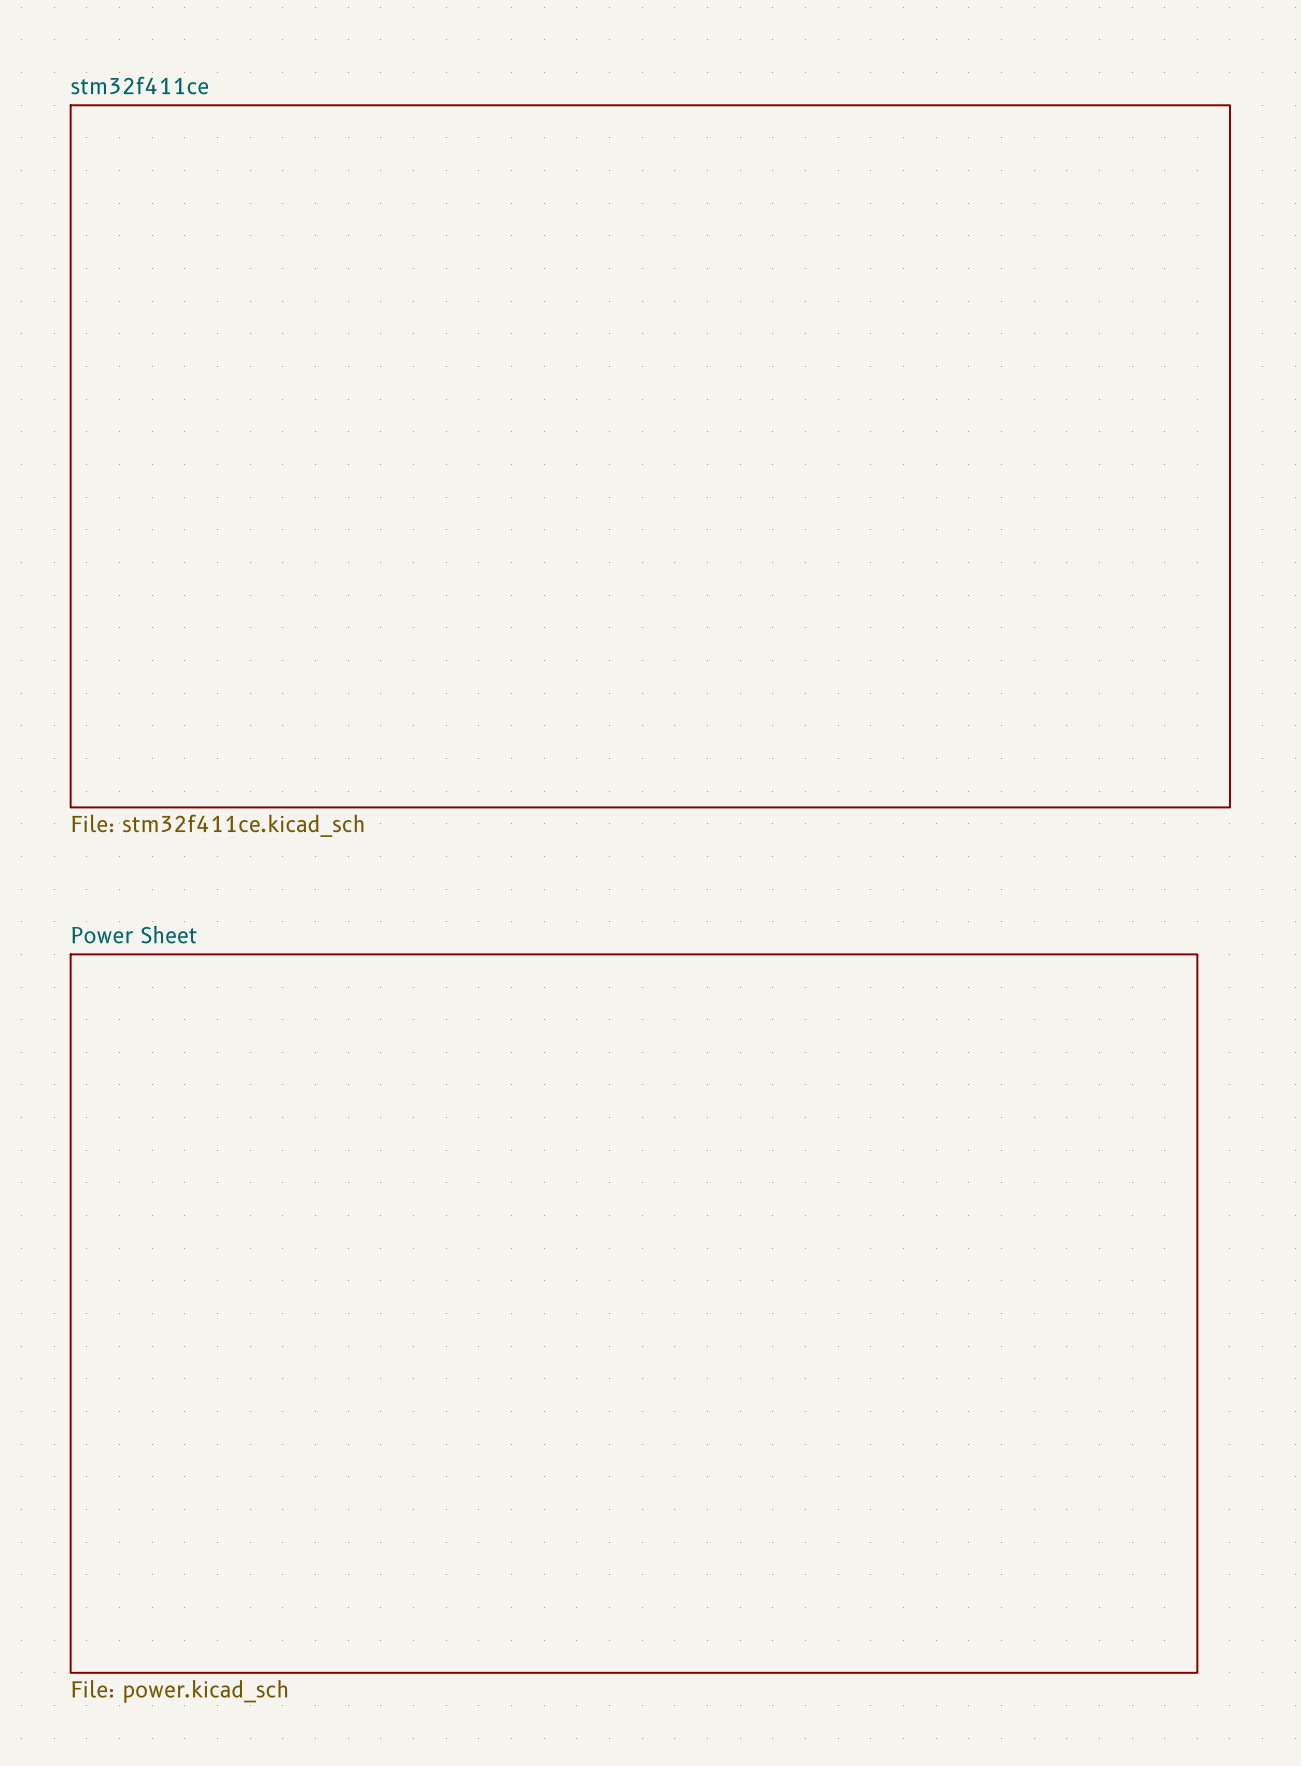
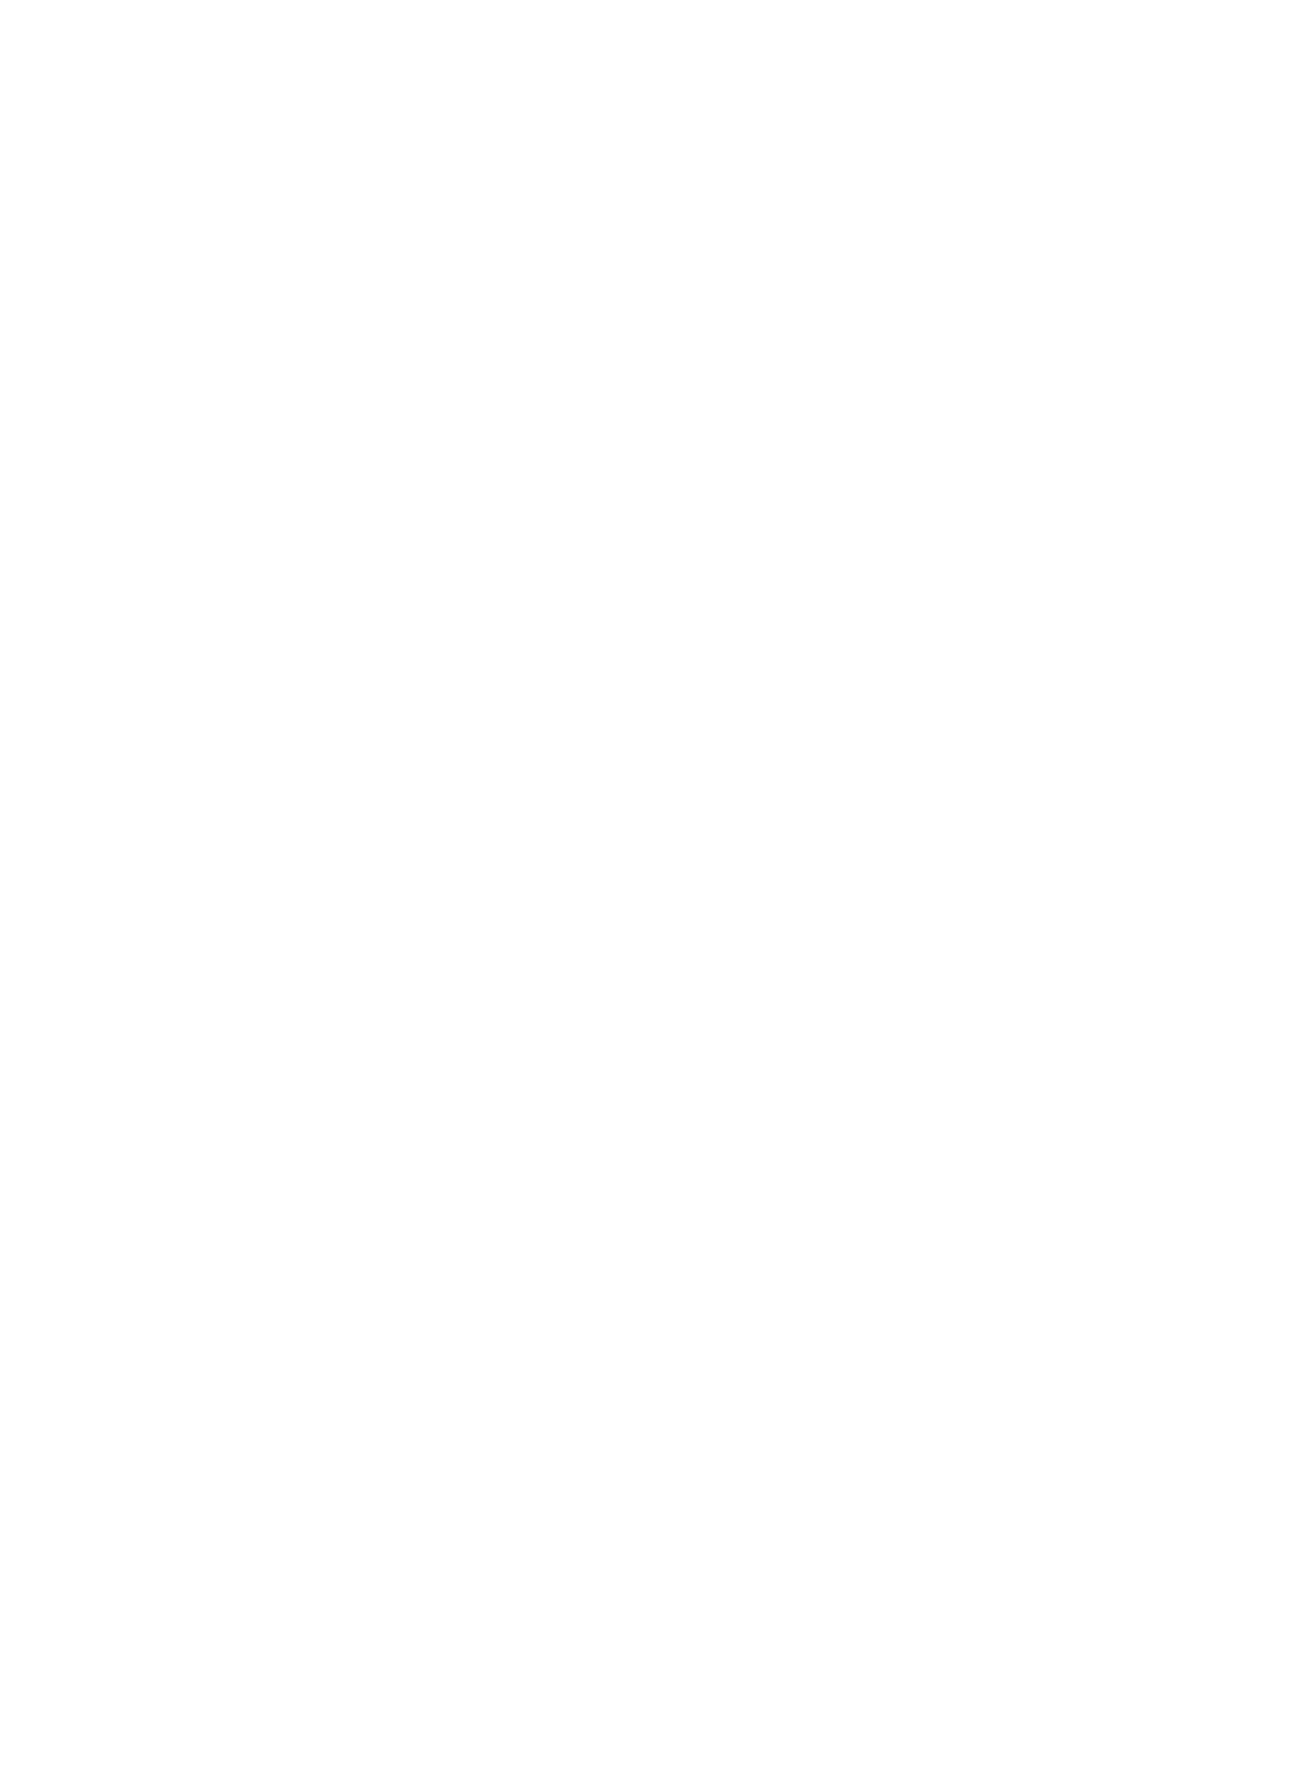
sheet stm32f411ce: File: stm32f411ce.kicad_sch (650, 456) -> none
sheet Power Sheet: File: power.kicad_sch (633, 1313) -> none

